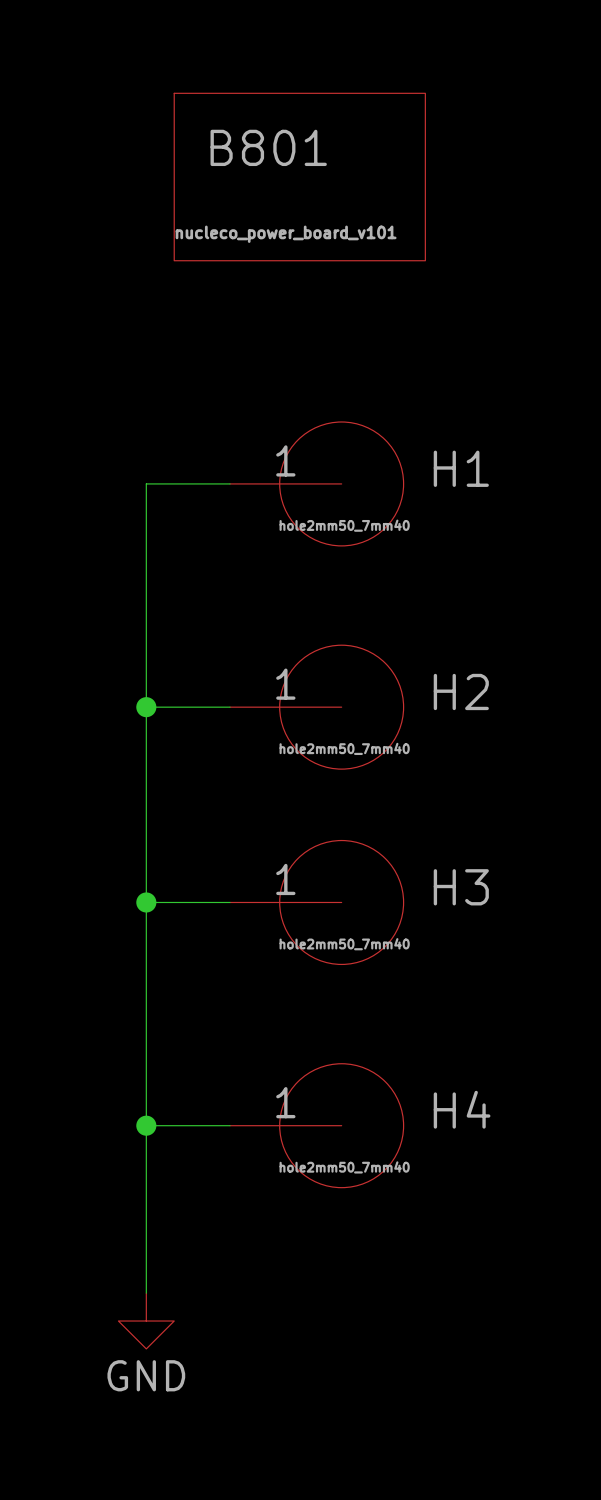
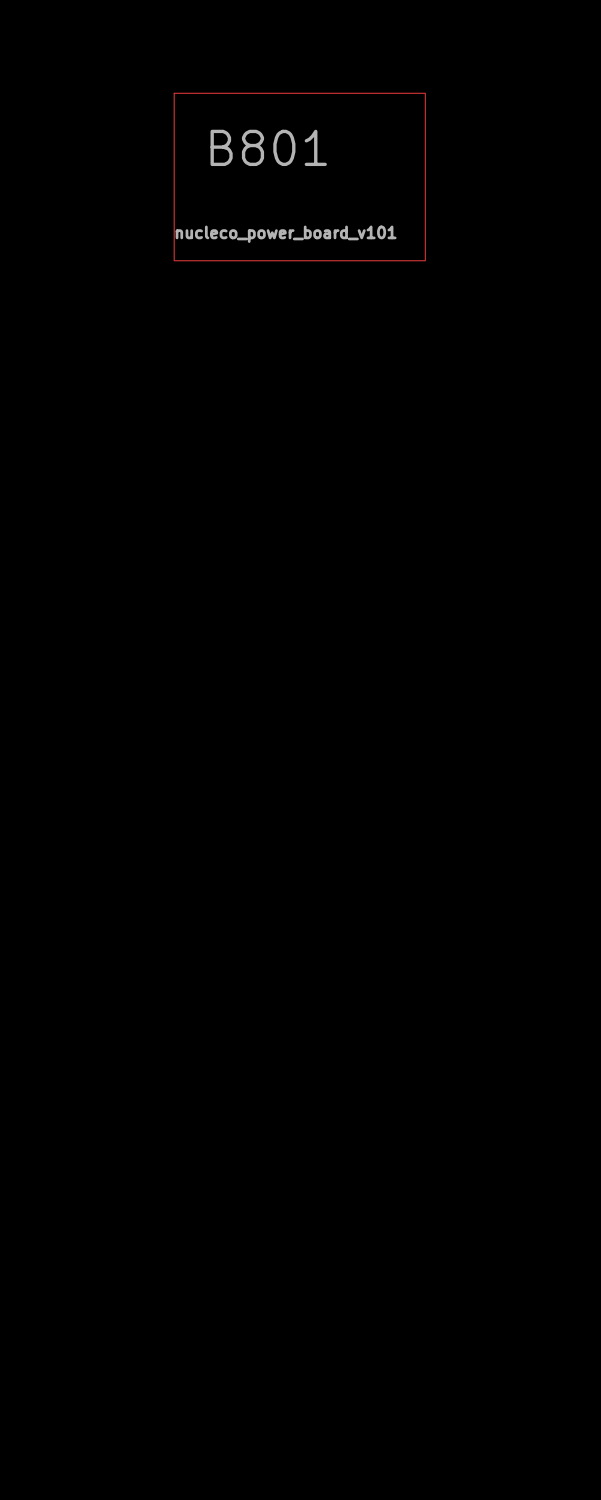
wire: (230, 483) (146, 483) (146, 1293) -> none
H1: hole2mm50_7mm40 (316, 483) -> none
wire: (146, 707) (230, 707) -> none
junction: (146, 707) -> none
H2: hole2mm50_7mm40 (316, 707) -> none
wire: (146, 902) (230, 902) -> none
junction: (146, 902) -> none
H3: hole2mm50_7mm40 (316, 902) -> none
wire: (146, 1125) (230, 1125) -> none
junction: (146, 1125) -> none
H4: hole2mm50_7mm40 (316, 1125) -> none
power symbol: GND (146, 1321) -> none

